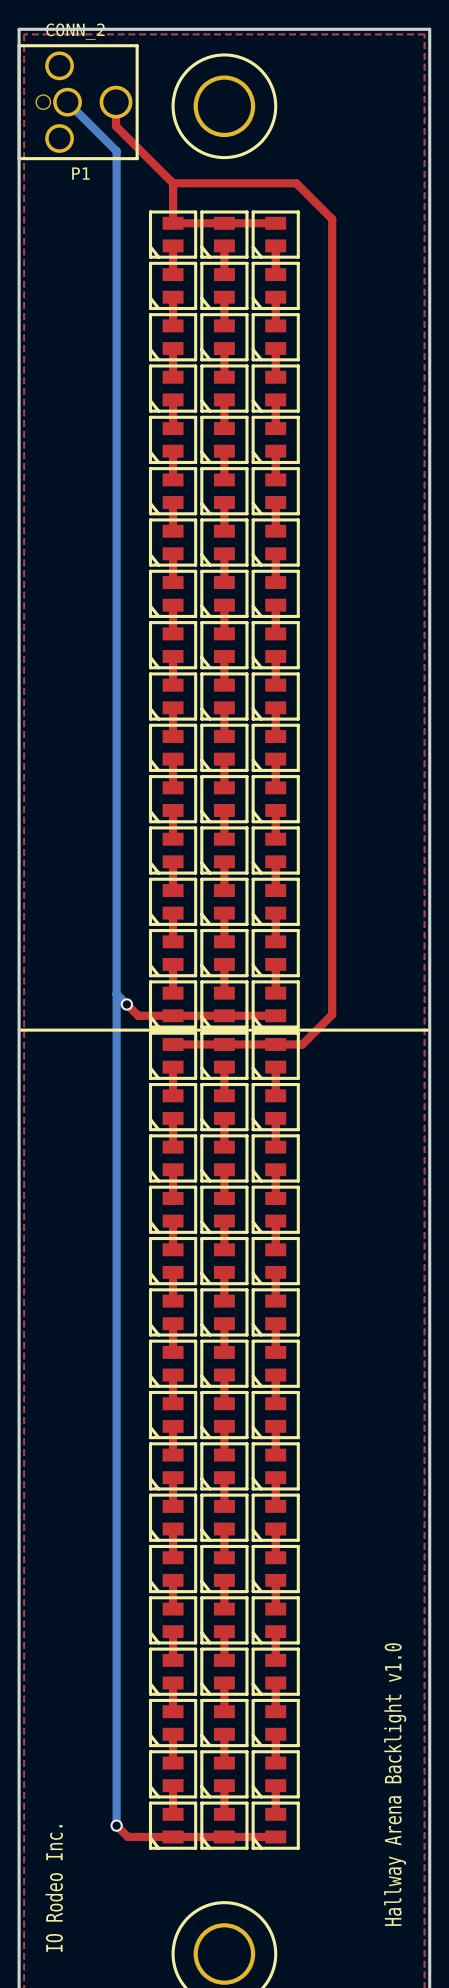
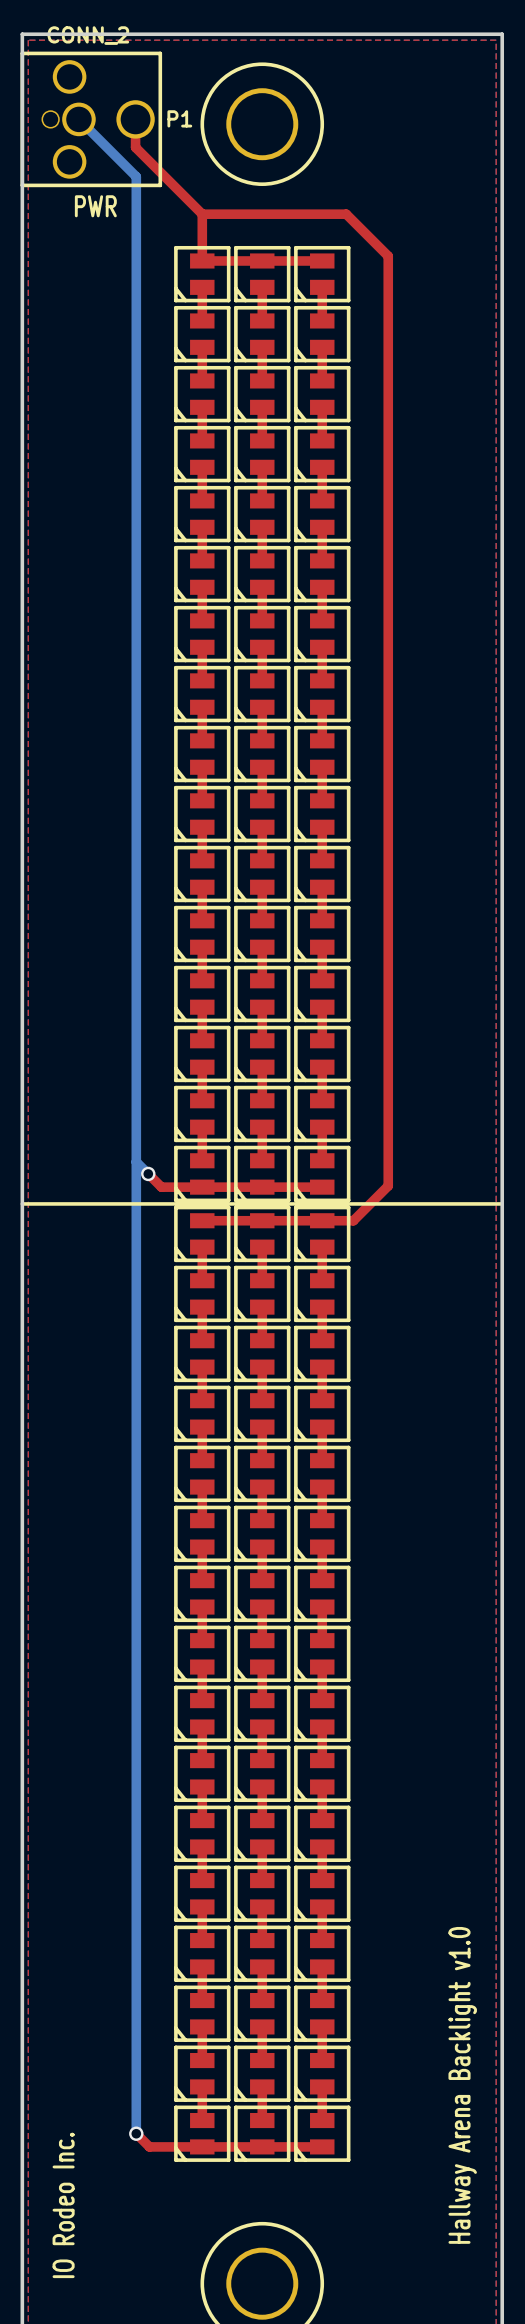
P1 name position: P1 (80, 173) -> P1 (179, 118)
text: none -> PWR (95, 206)

